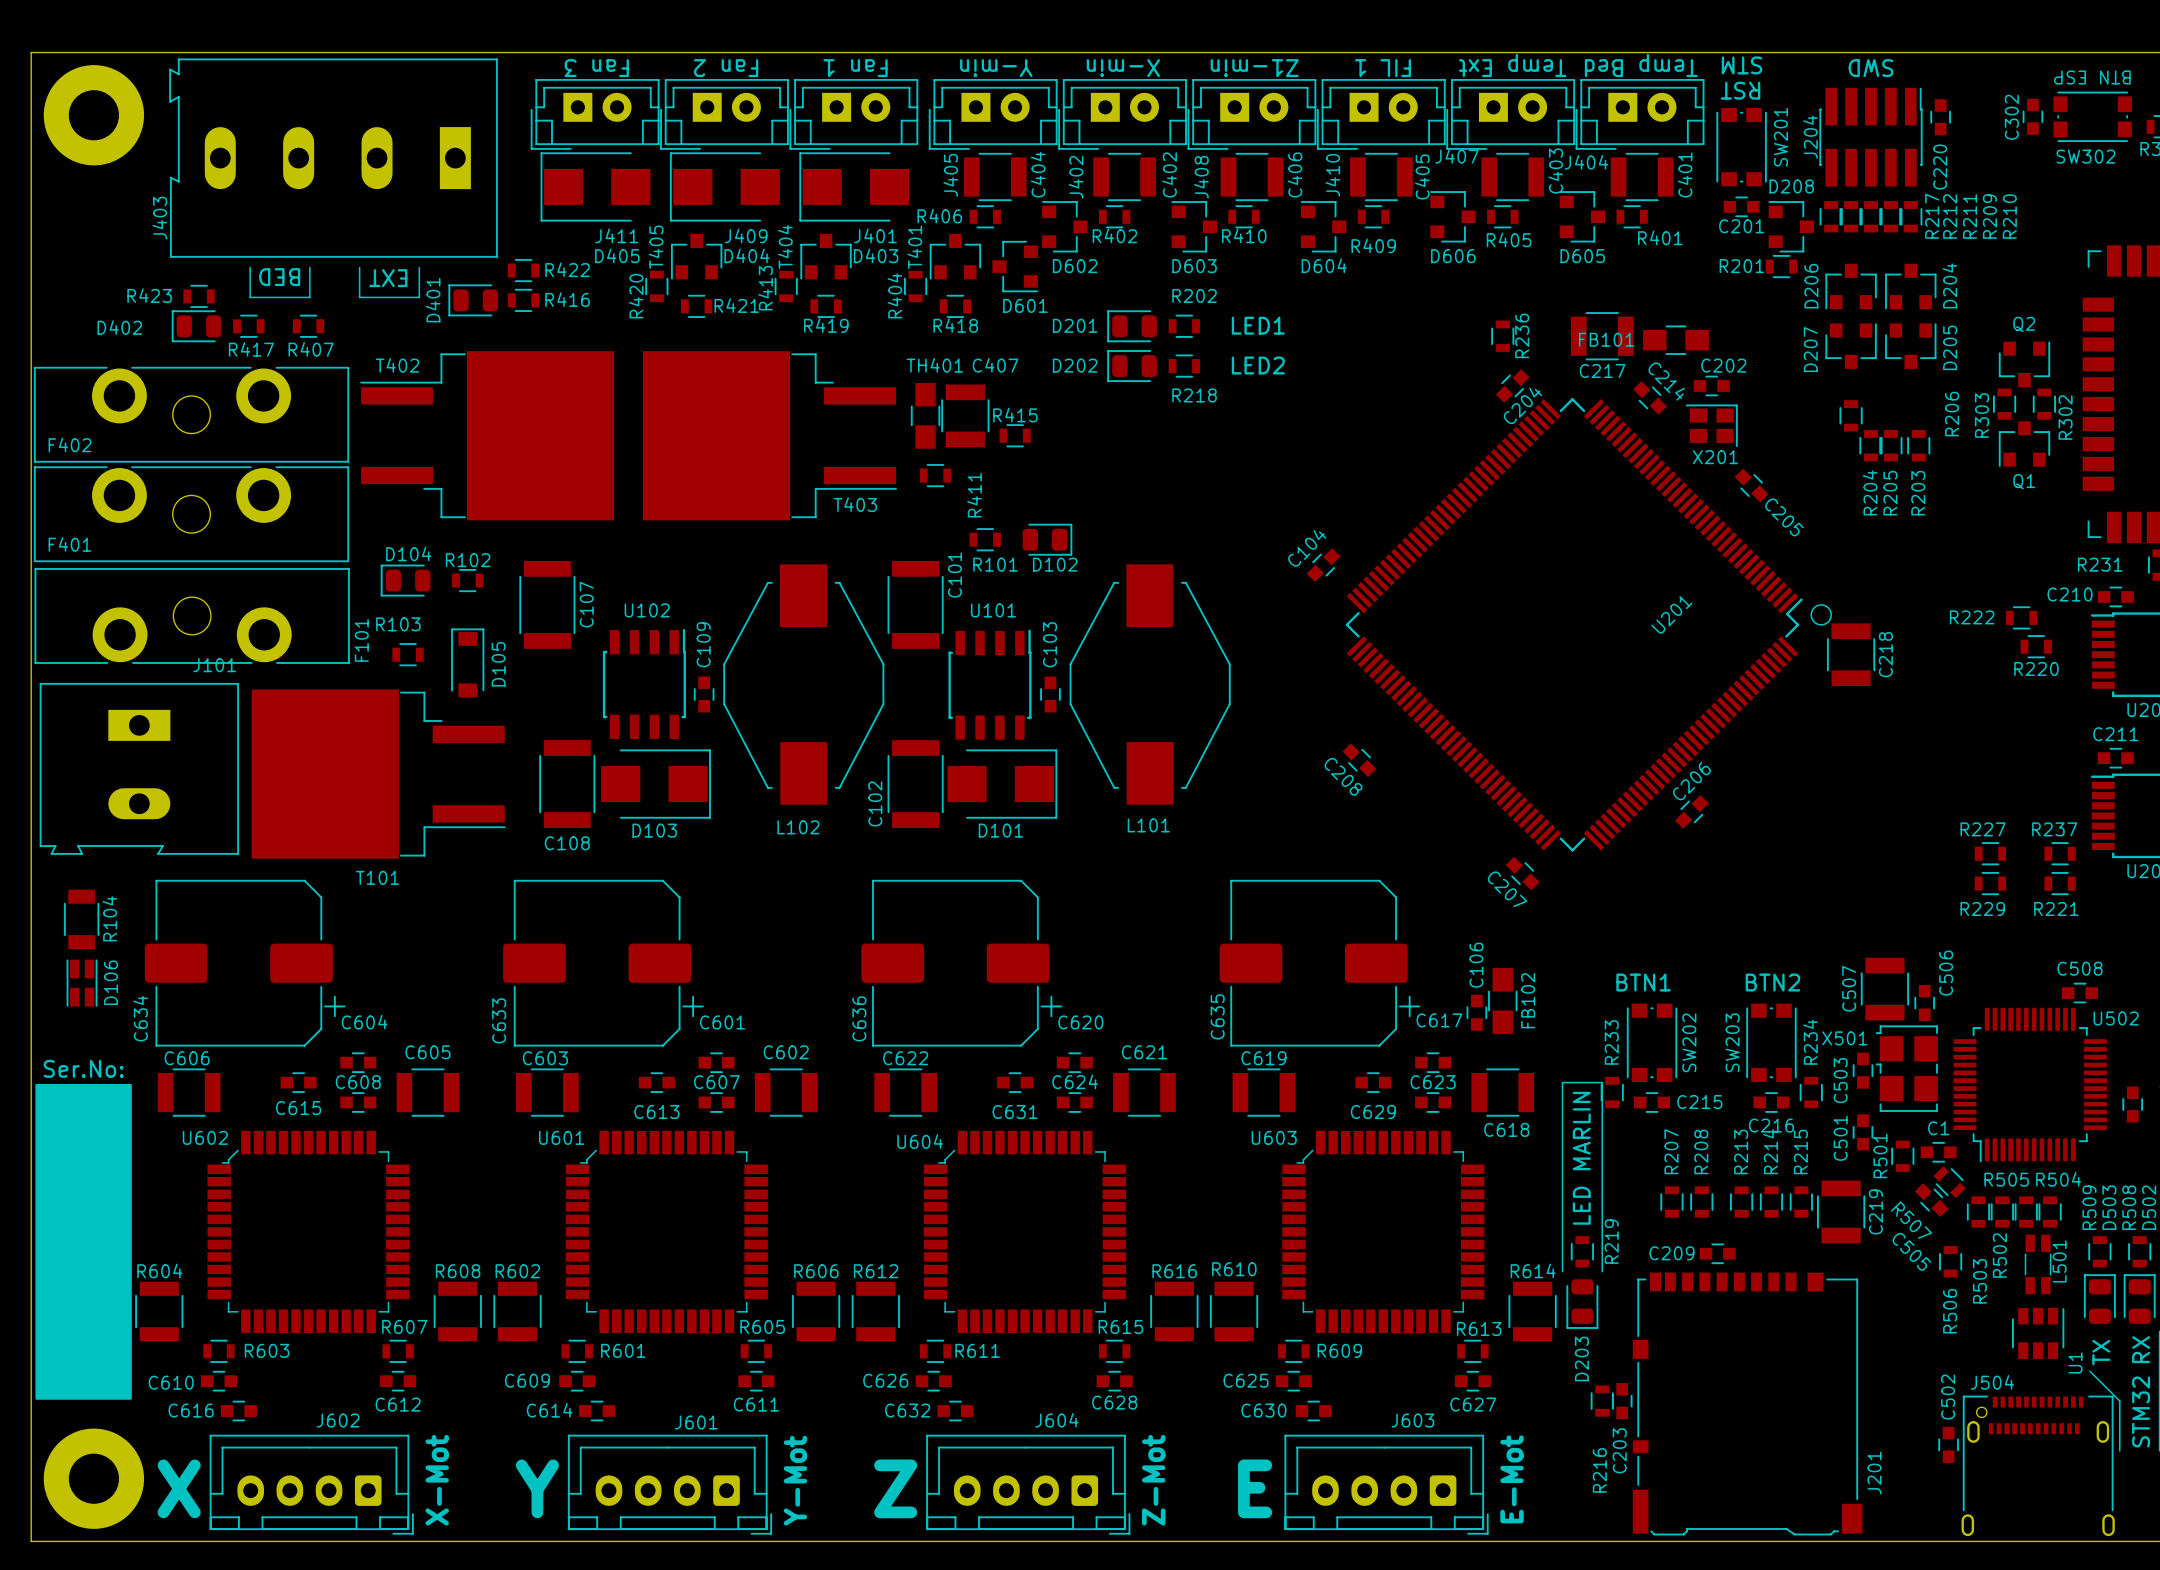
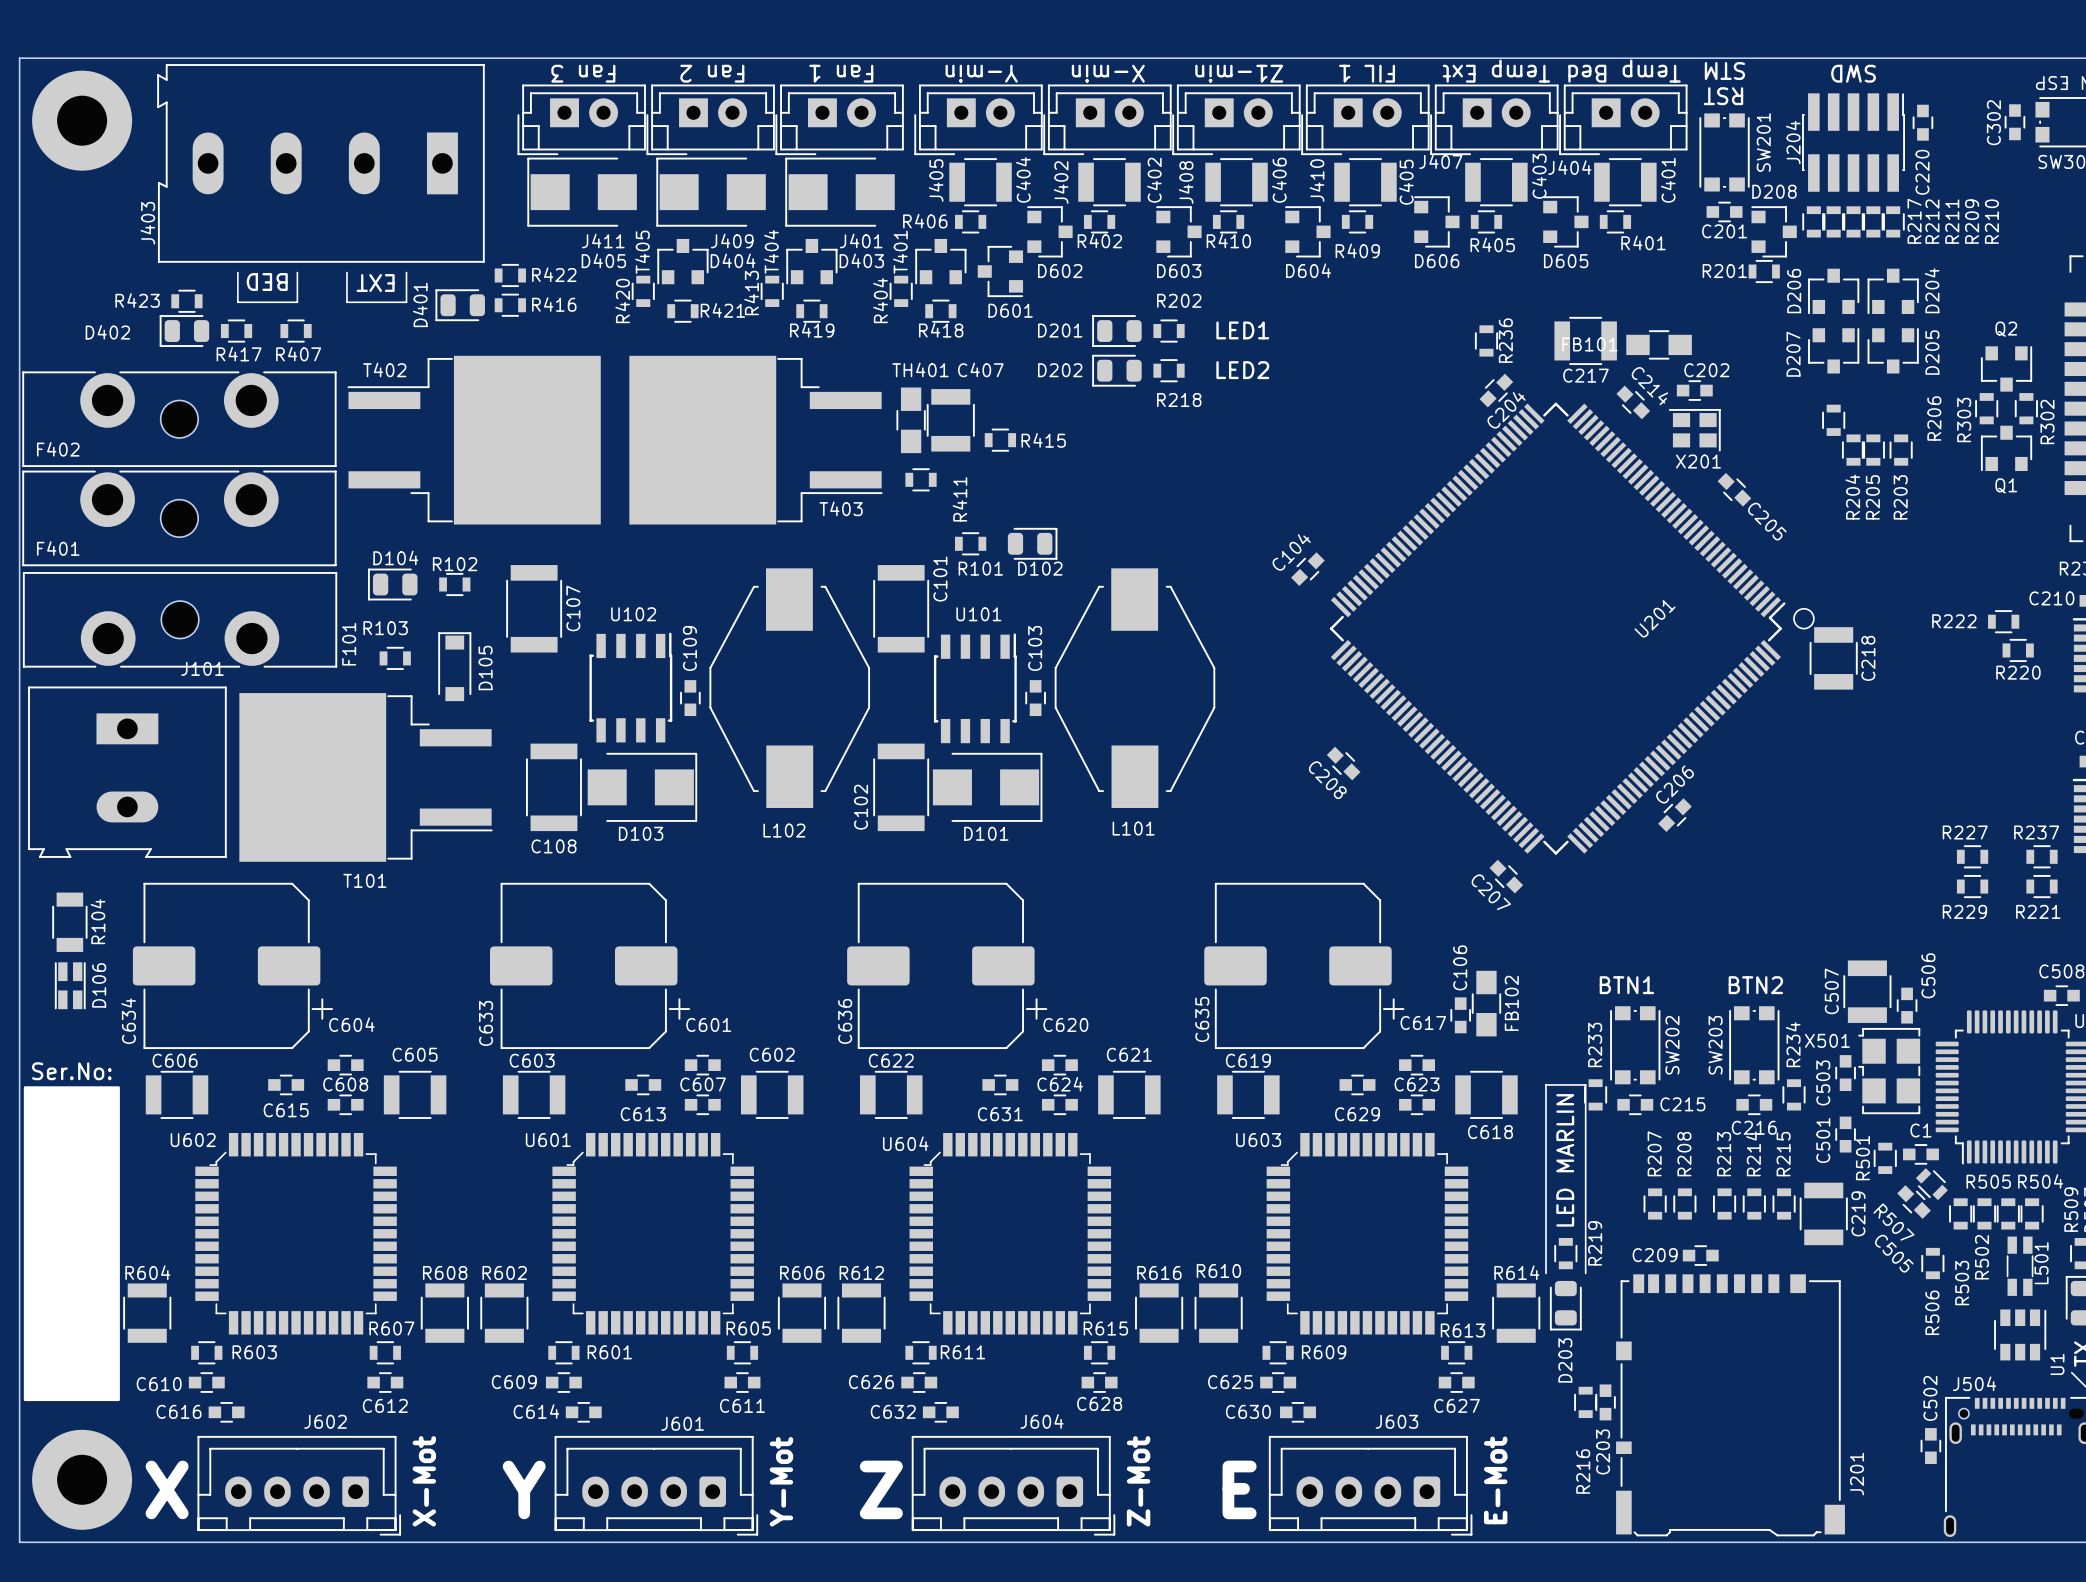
R415 name position: R415 (1015, 415) -> R415 (1043, 440)

